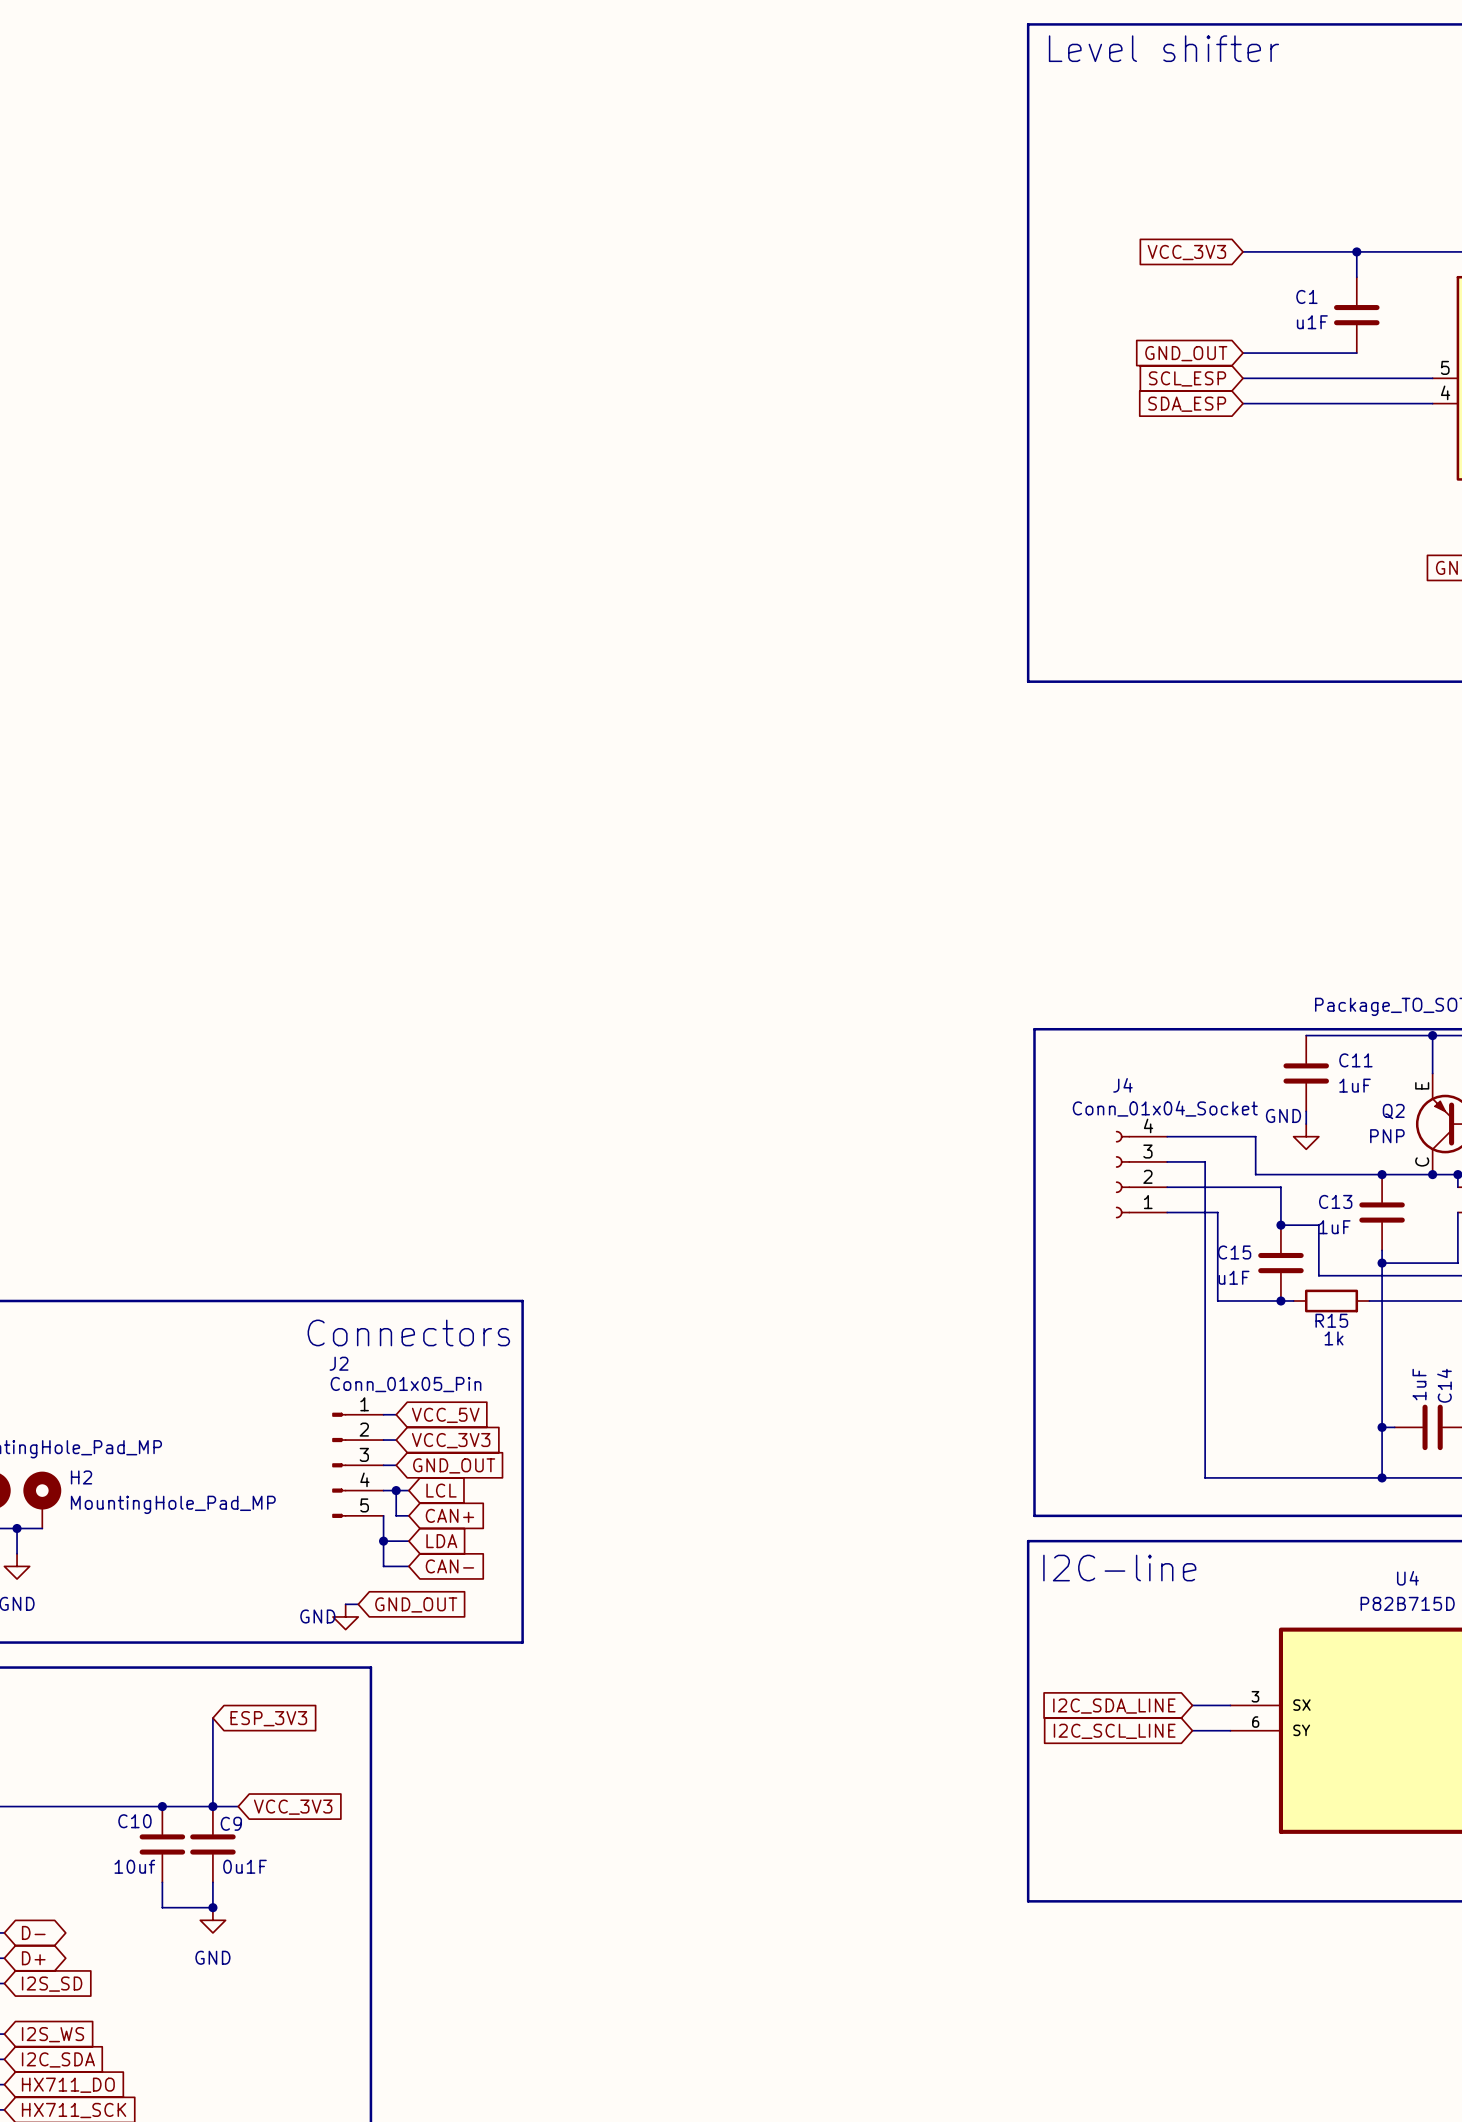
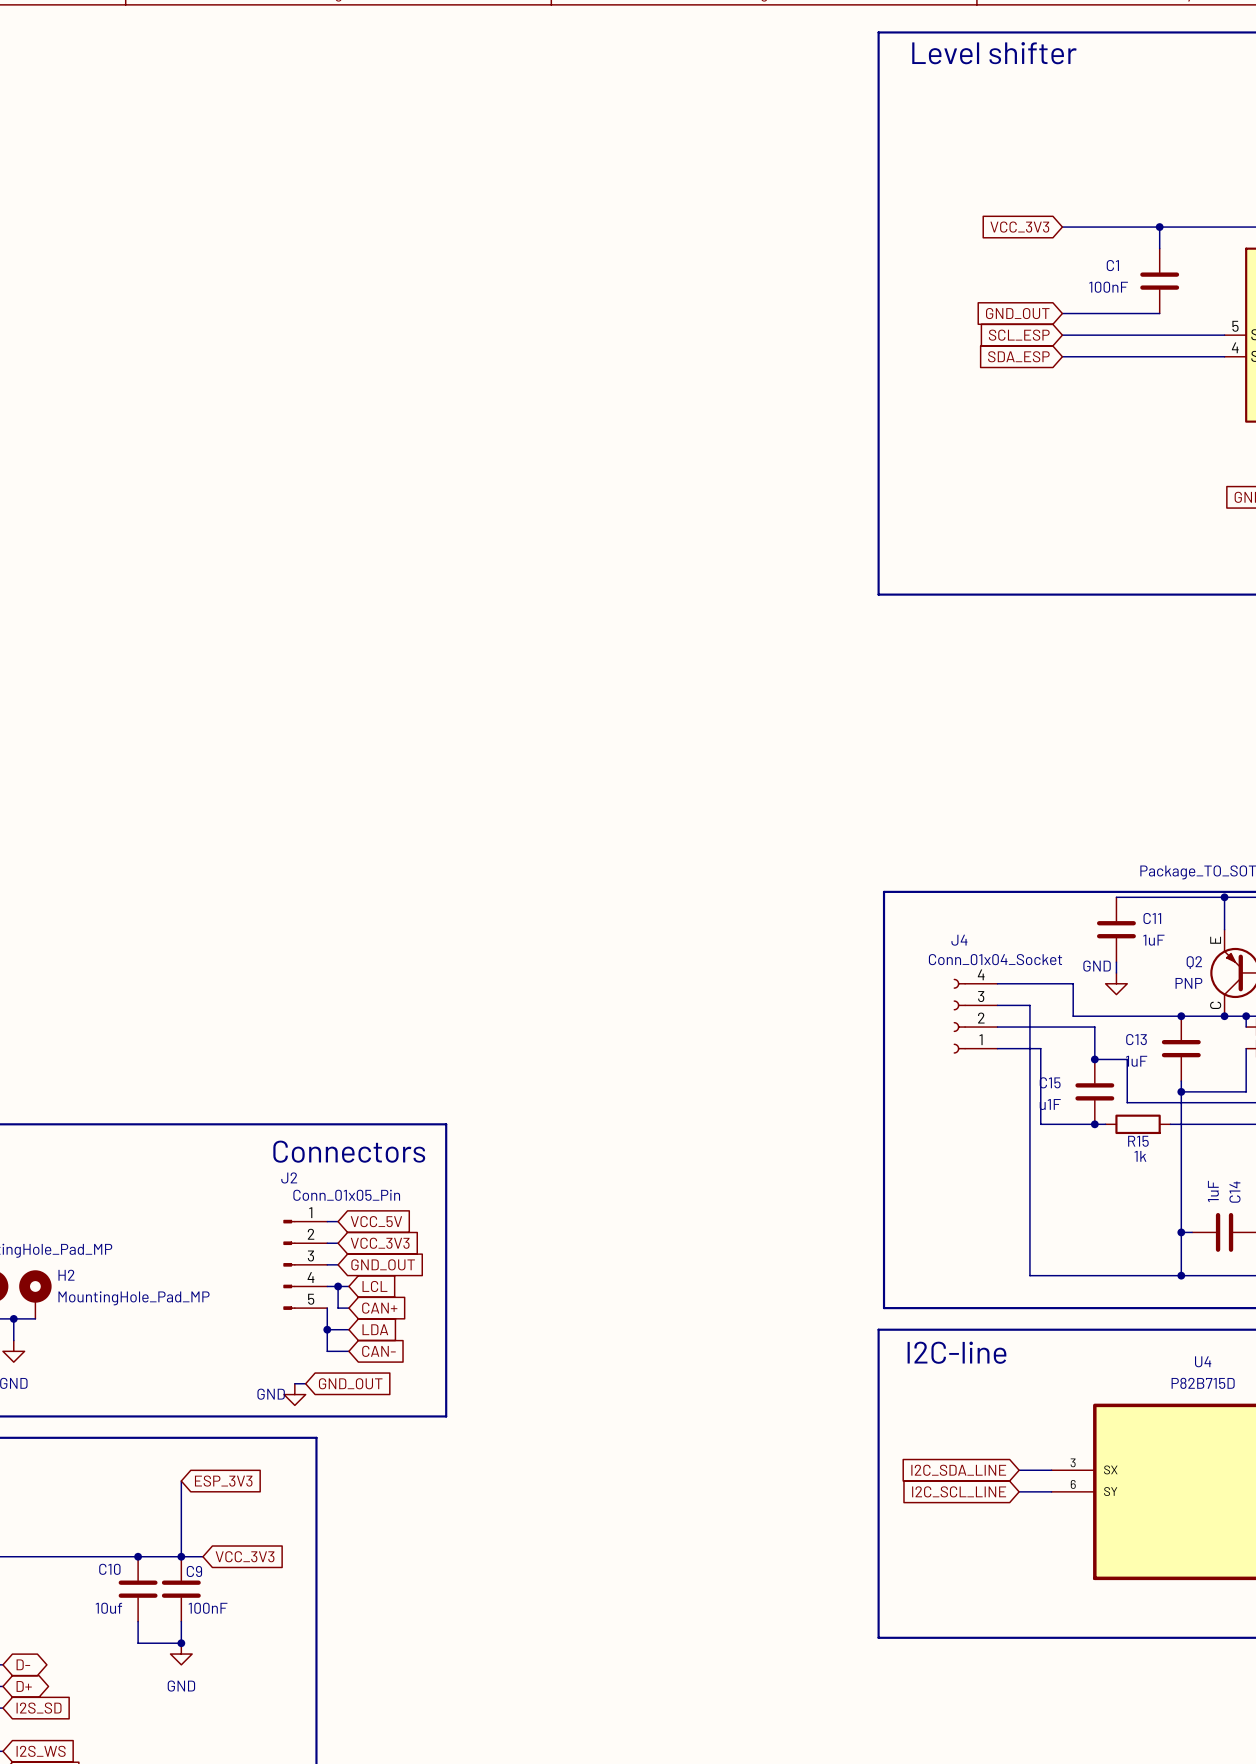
C1 value: u1F (1312, 322) -> 100nF (1108, 287)
C9 value: 0u1F (244, 1866) -> 100nF (208, 1608)

